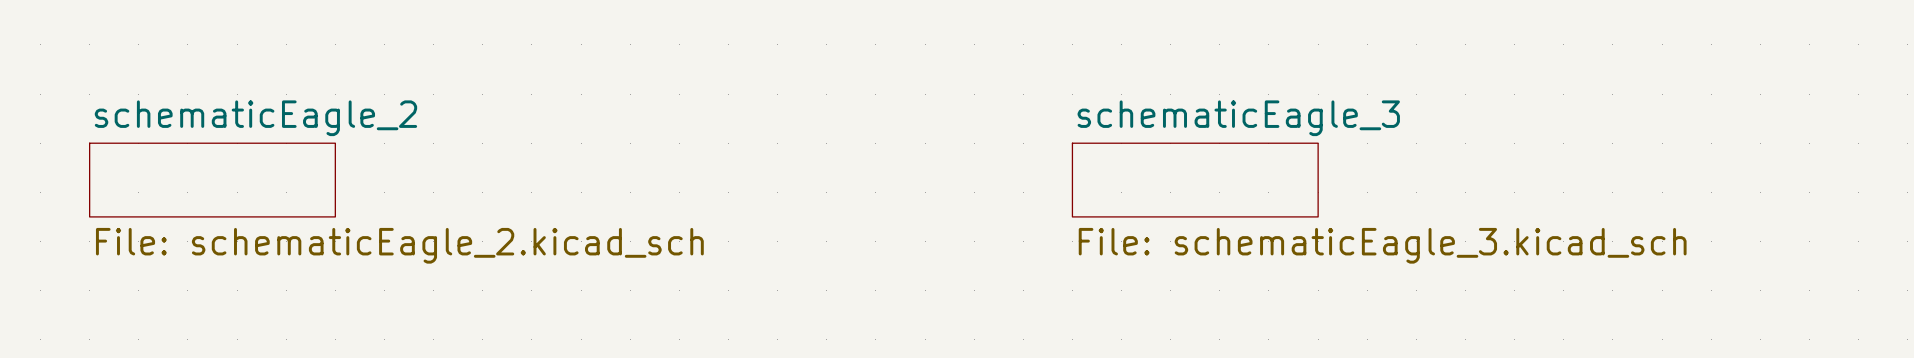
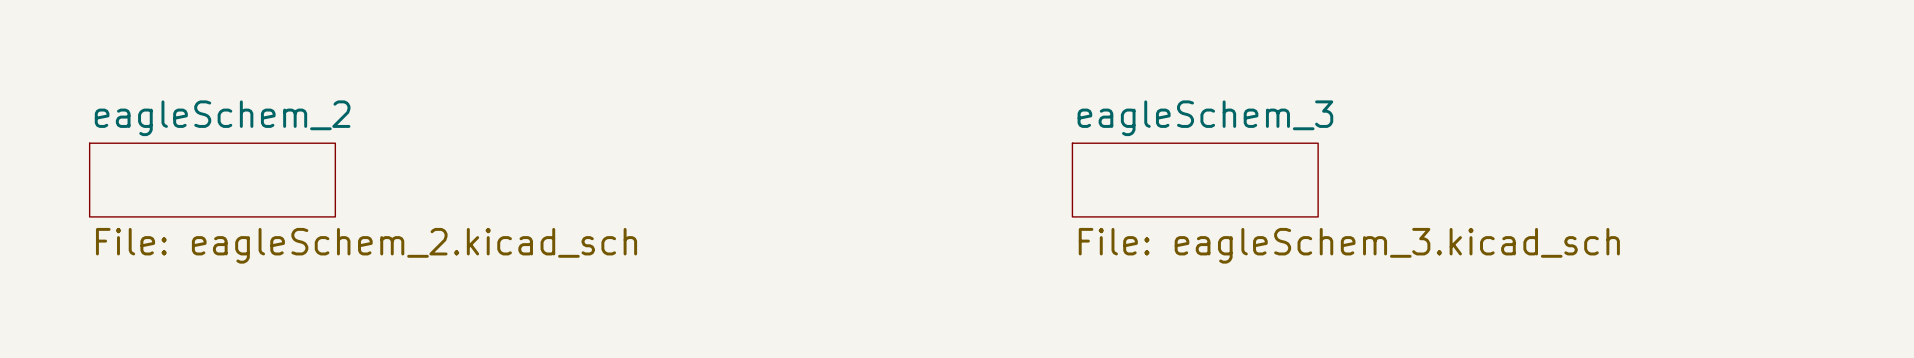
sheet schematicEagle_2 name: schematicEagle_2 (255, 118) -> eagleSchem_2 (222, 118)
sheet schematicEagle_3 name: schematicEagle_3 (1238, 118) -> eagleSchem_3 (1205, 118)
sheet schematicEagle_2 value: File: schematicEagle_2.kicad_sch (399, 245) -> File: eagleSchem_2.kicad_sch (366, 245)
sheet schematicEagle_3 value: File: schematicEagle_3.kicad_sch (1382, 245) -> File: eagleSchem_3.kicad_sch (1349, 245)

